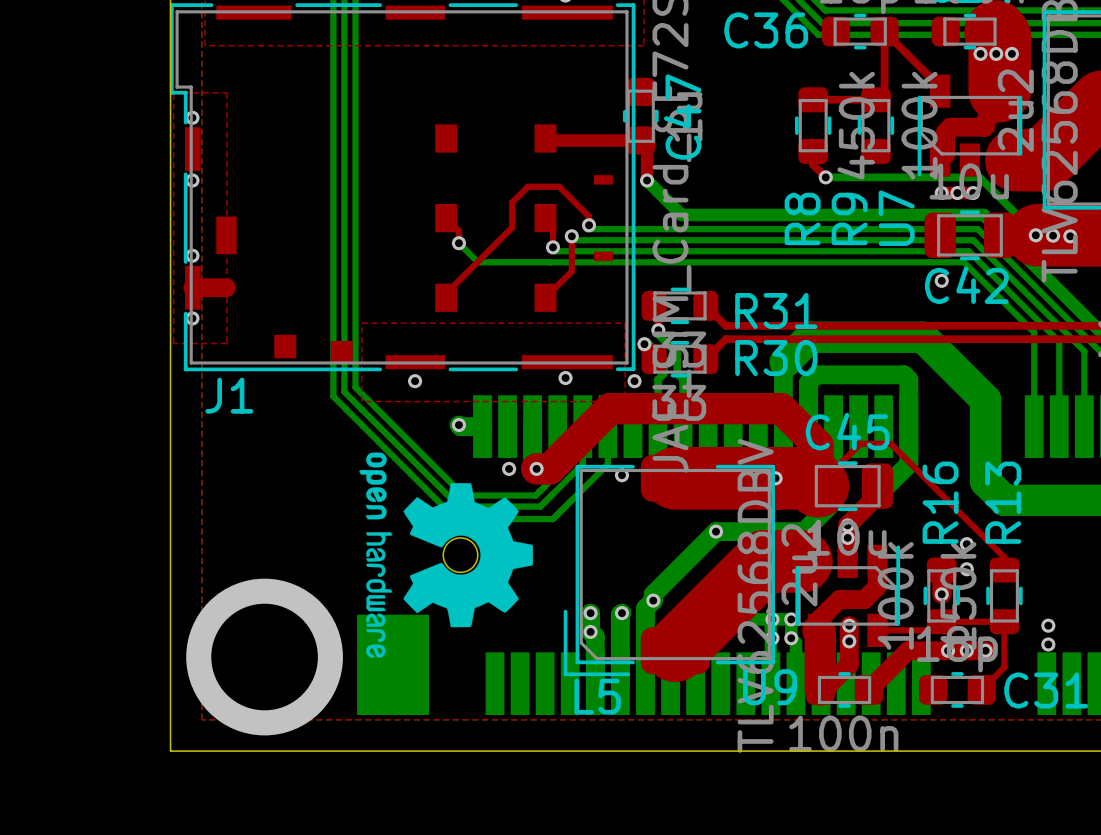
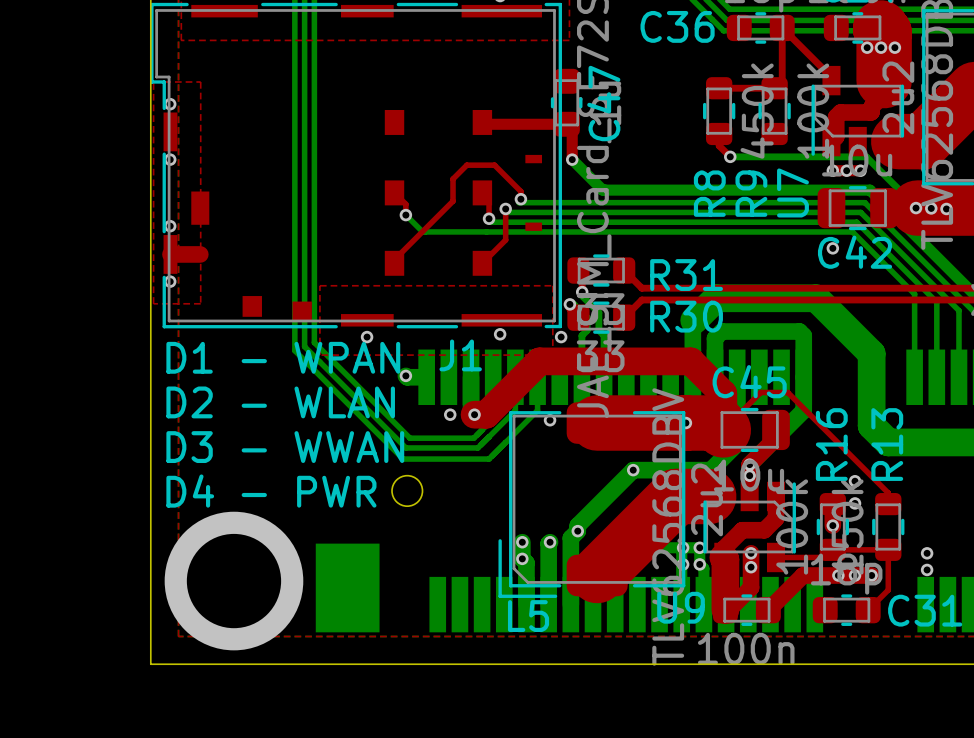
J1 name position: J1 (229, 395) -> J1 (460, 355)
text: none -> D1 - WPAN (283, 357)
drawing: [359, 452, 534, 658] -> none
text: none -> D2 - WLAN (280, 402)
text: none -> D3 - WWAN (285, 447)
text: none -> D4 - PWR (271, 491)

